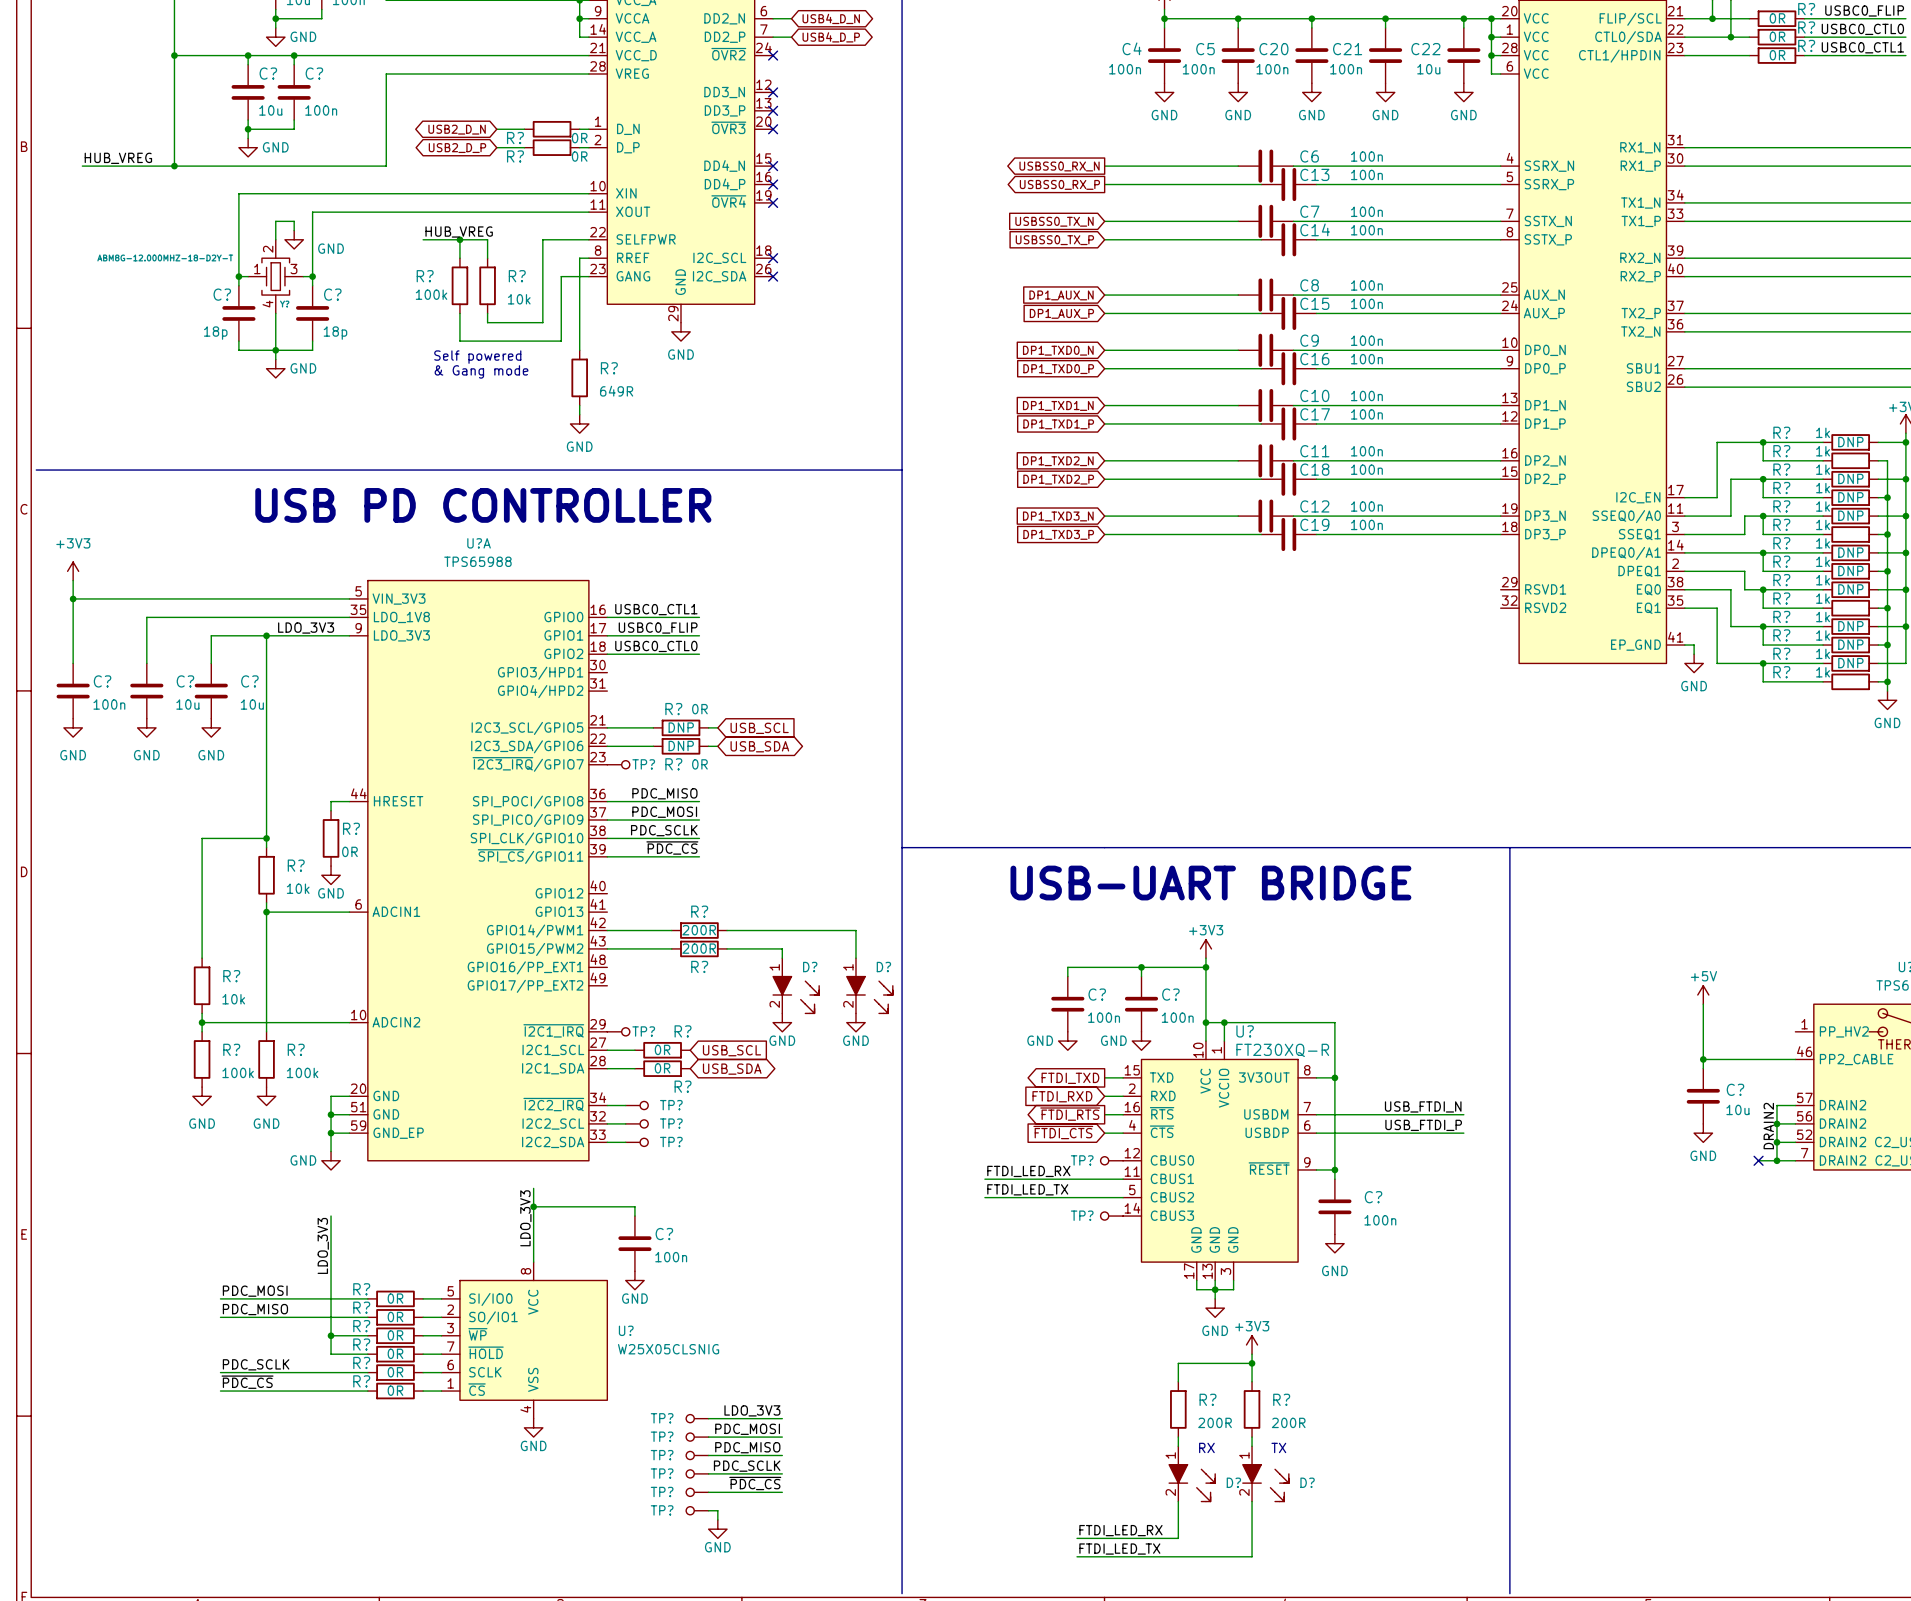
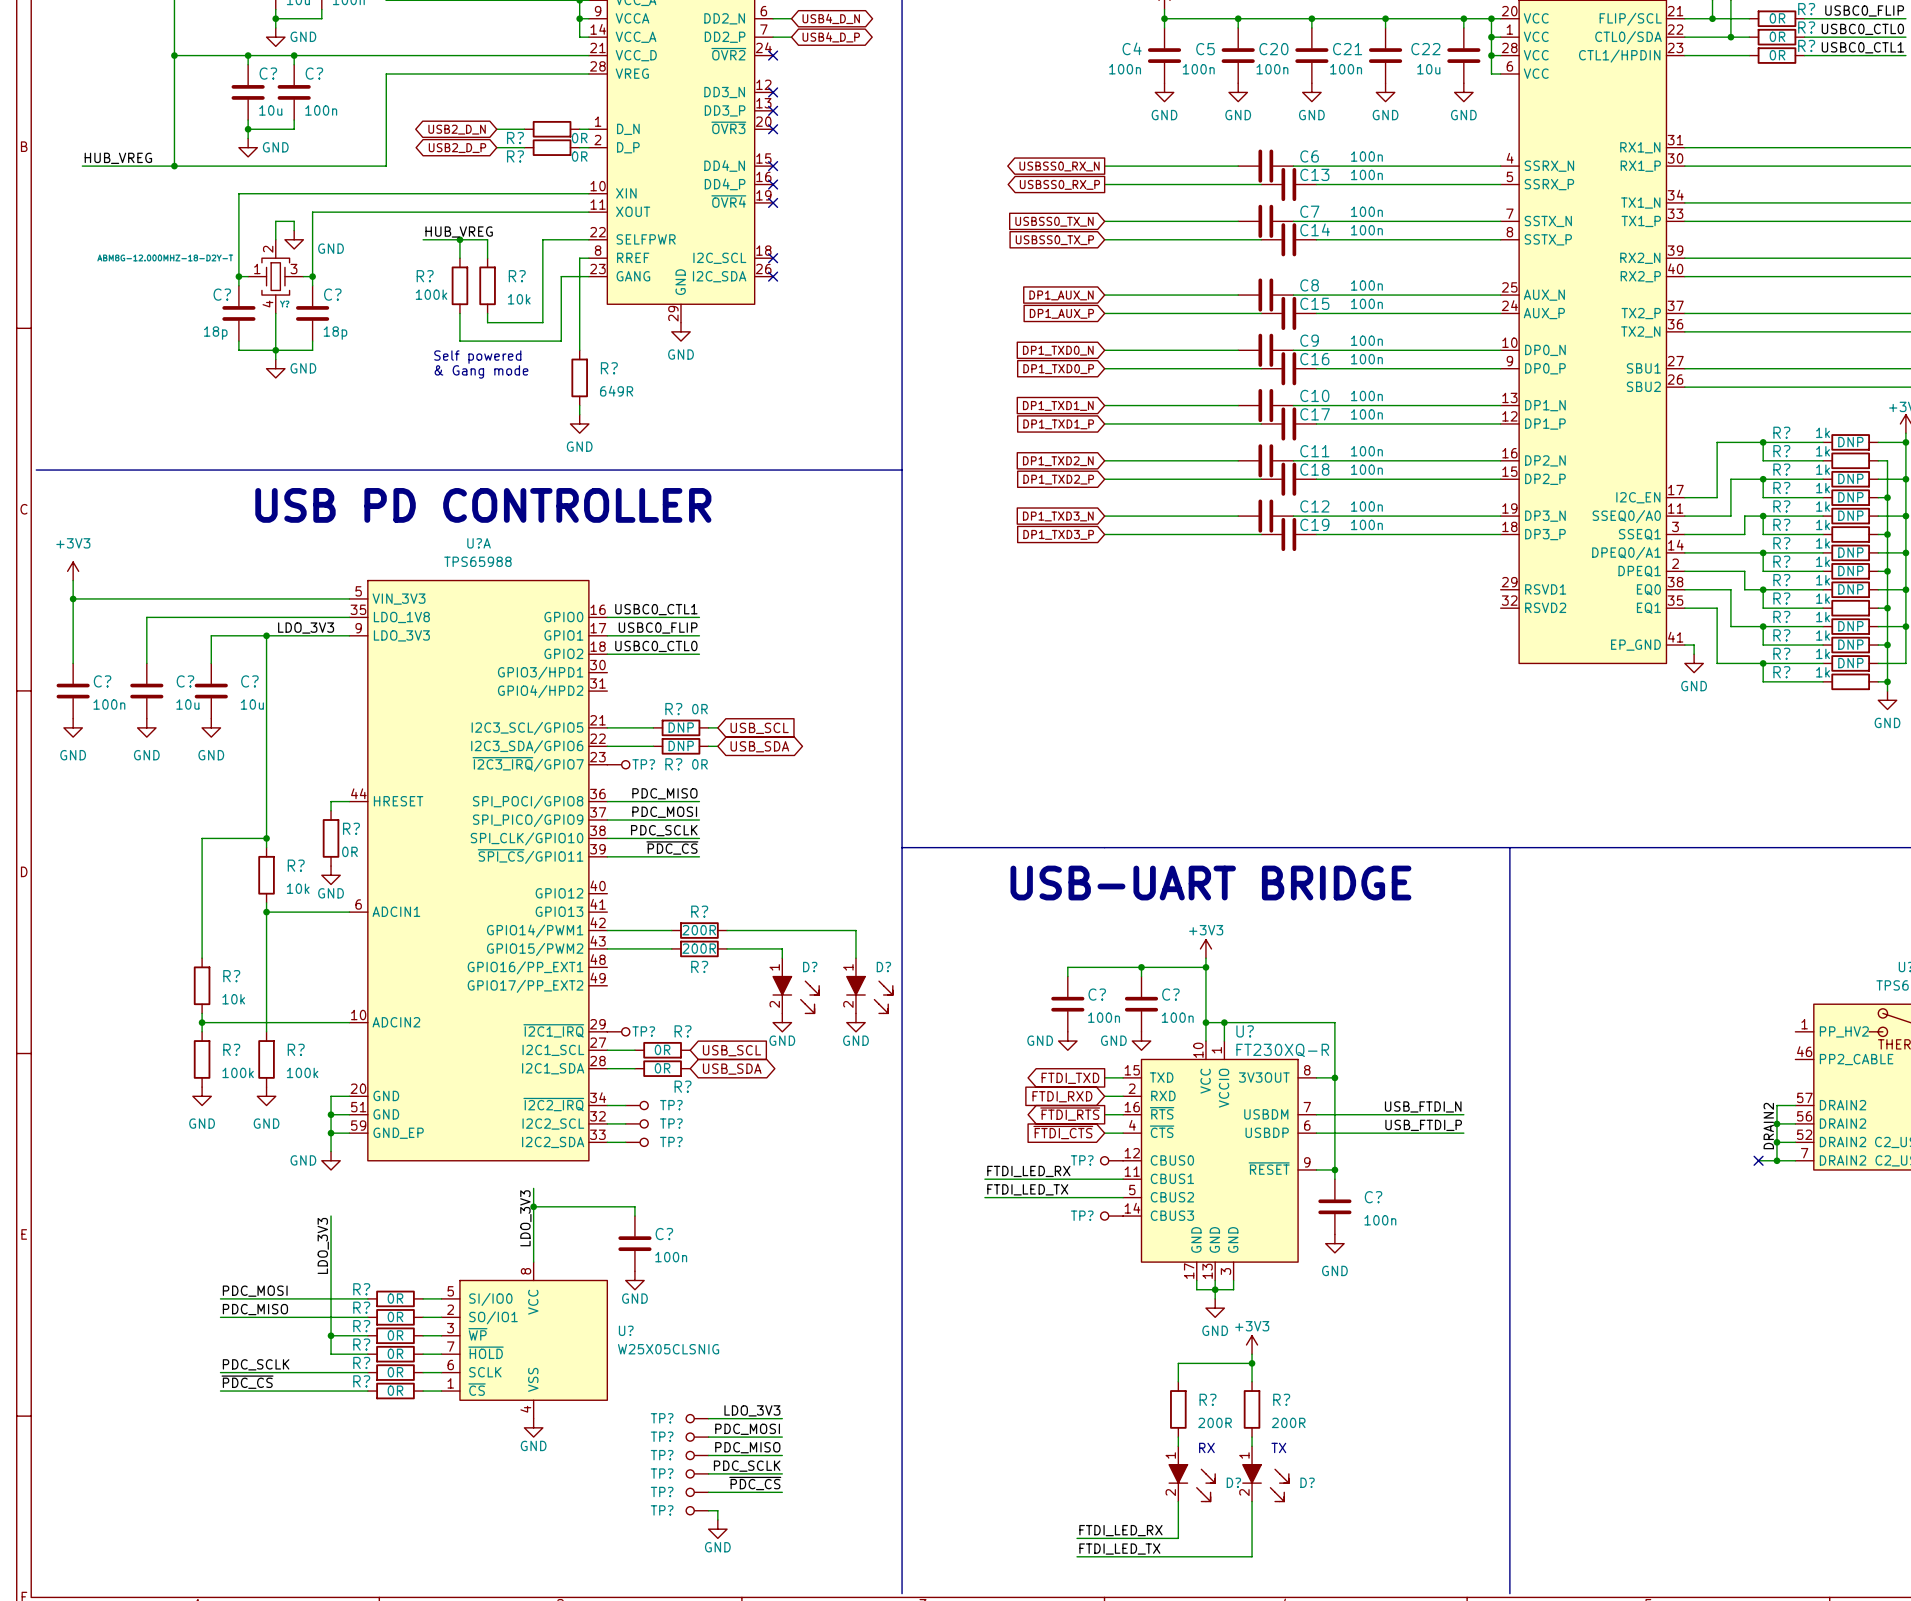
power symbol: +5V (1703, 994) -> none
wire: (1703, 1004) (1703, 1068) -> none
wire: (1703, 1059) (1795, 1059) -> none
junction: (1703, 1059) -> none
C?: (1703, 1096) -> none
power symbol: GND (1703, 1133) -> none

